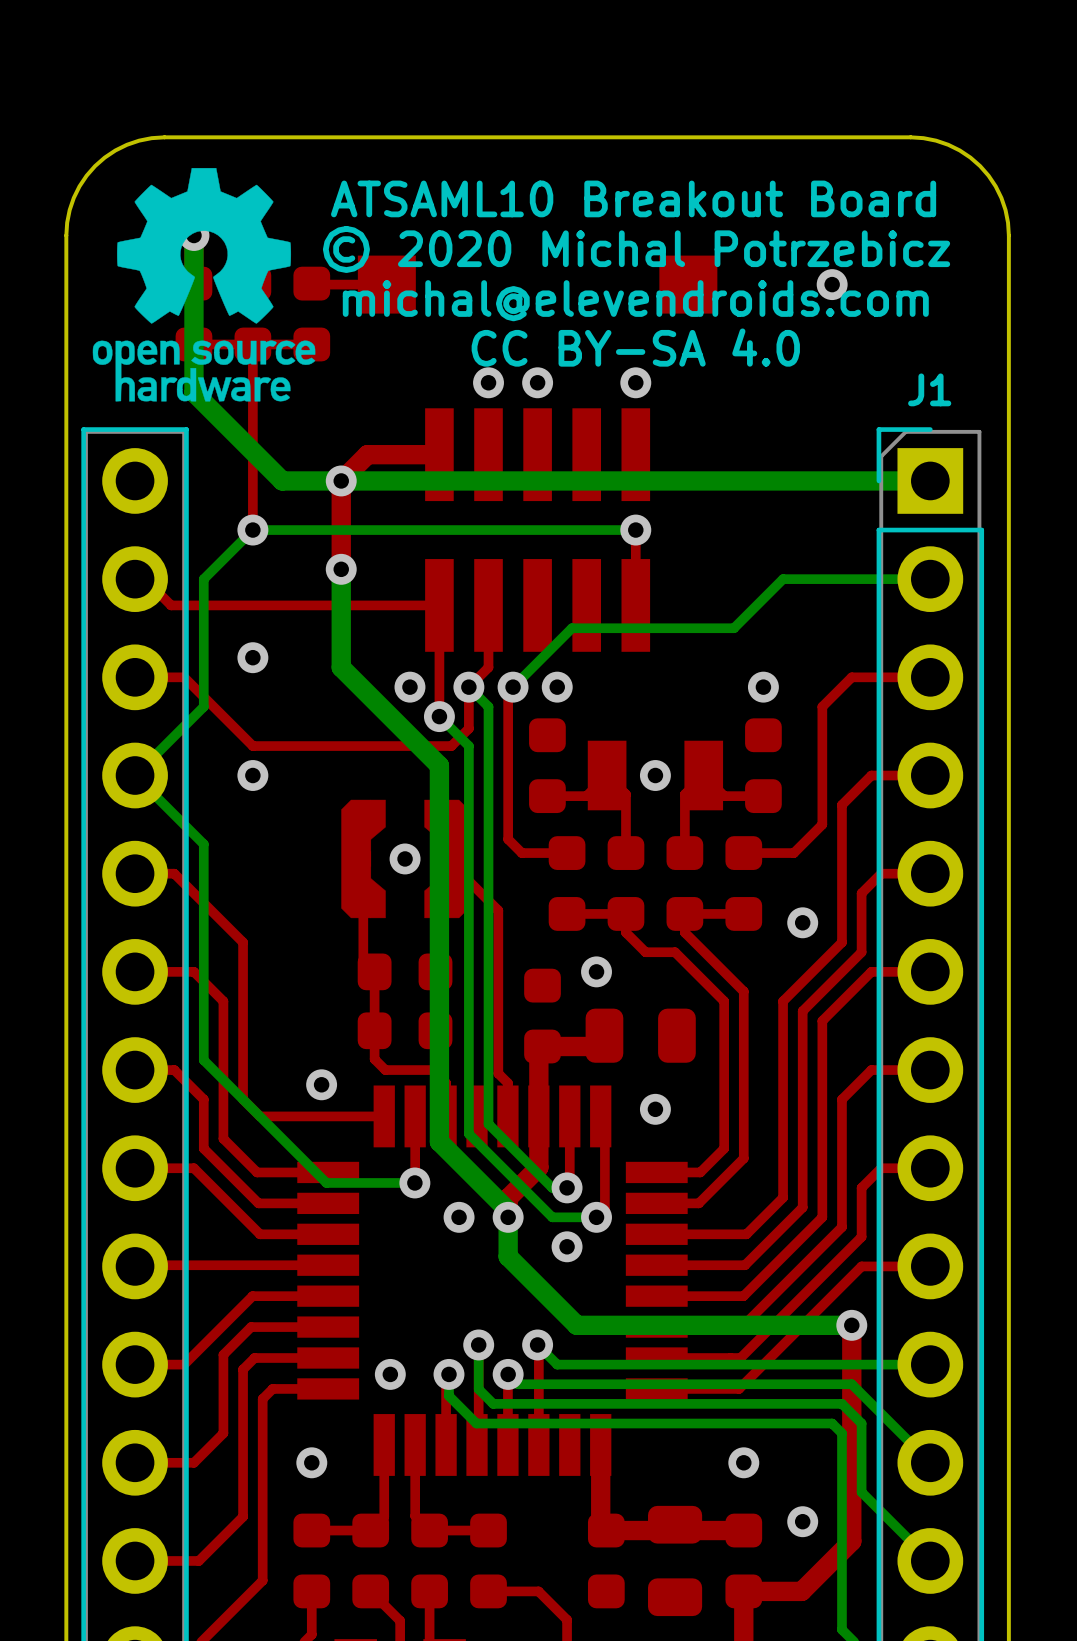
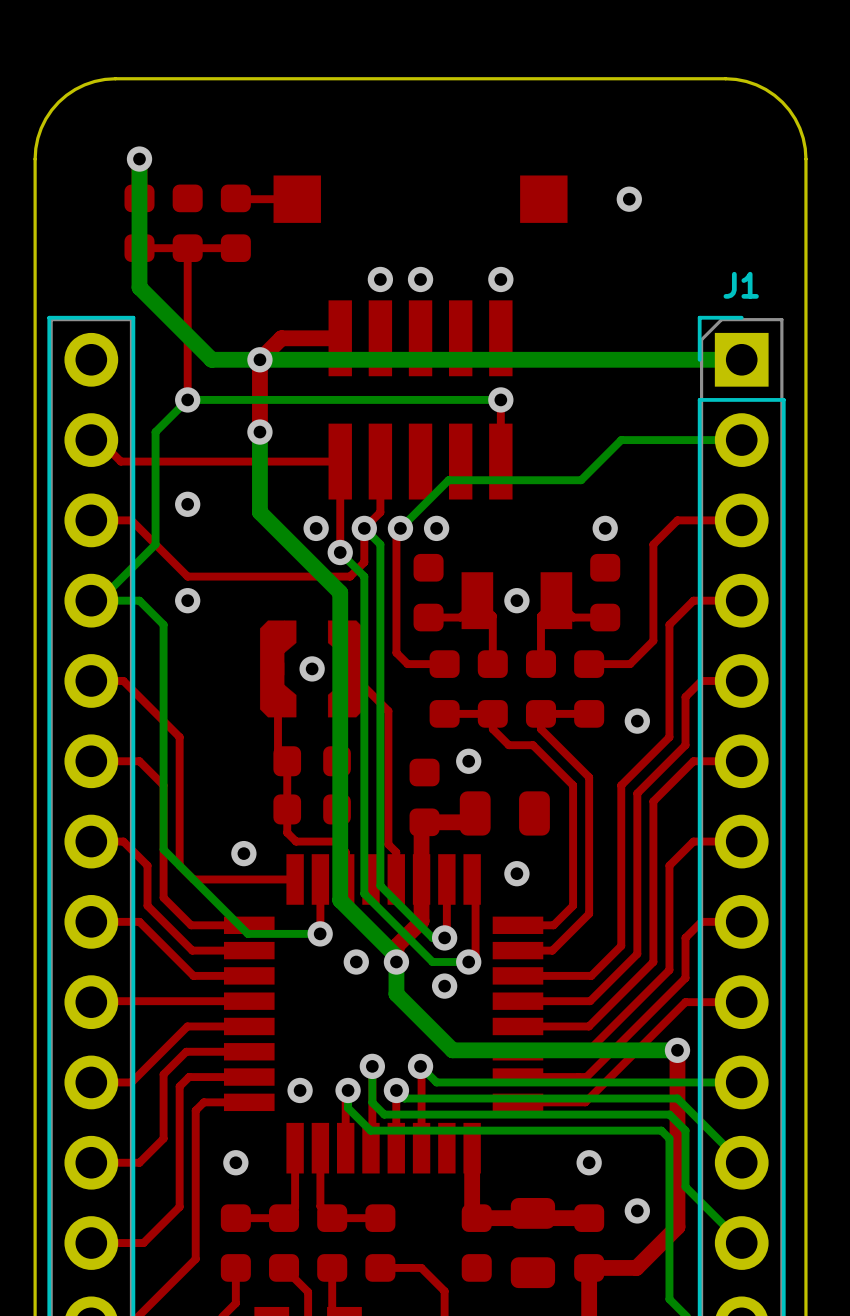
drawing: [92, 167, 316, 402] -> none
text: ATSAML10 Breakout Board (633, 198) -> none
text: © 2020 Michal Potrzebicz (636, 249) -> none
via position: (832, 284) -> (629, 199)
text: michal@elevendroids.com (635, 300) -> none
text: CC BY-SA 4.0 (635, 347) -> none
bottom track: (213, 569) (203, 579) (203, 706) (135, 775) (203, 844) (203, 1060) (223, 1079) -> (155, 432) (155, 544) (99, 600) (139, 600) (163, 624) (163, 849)

